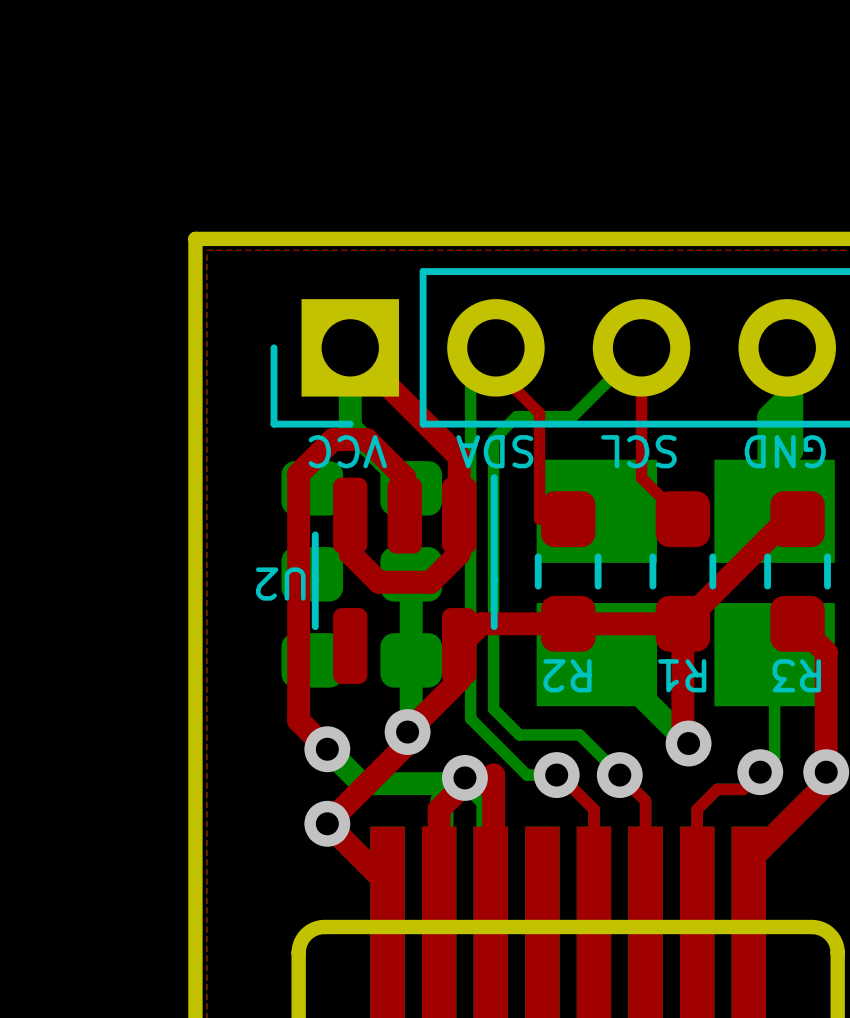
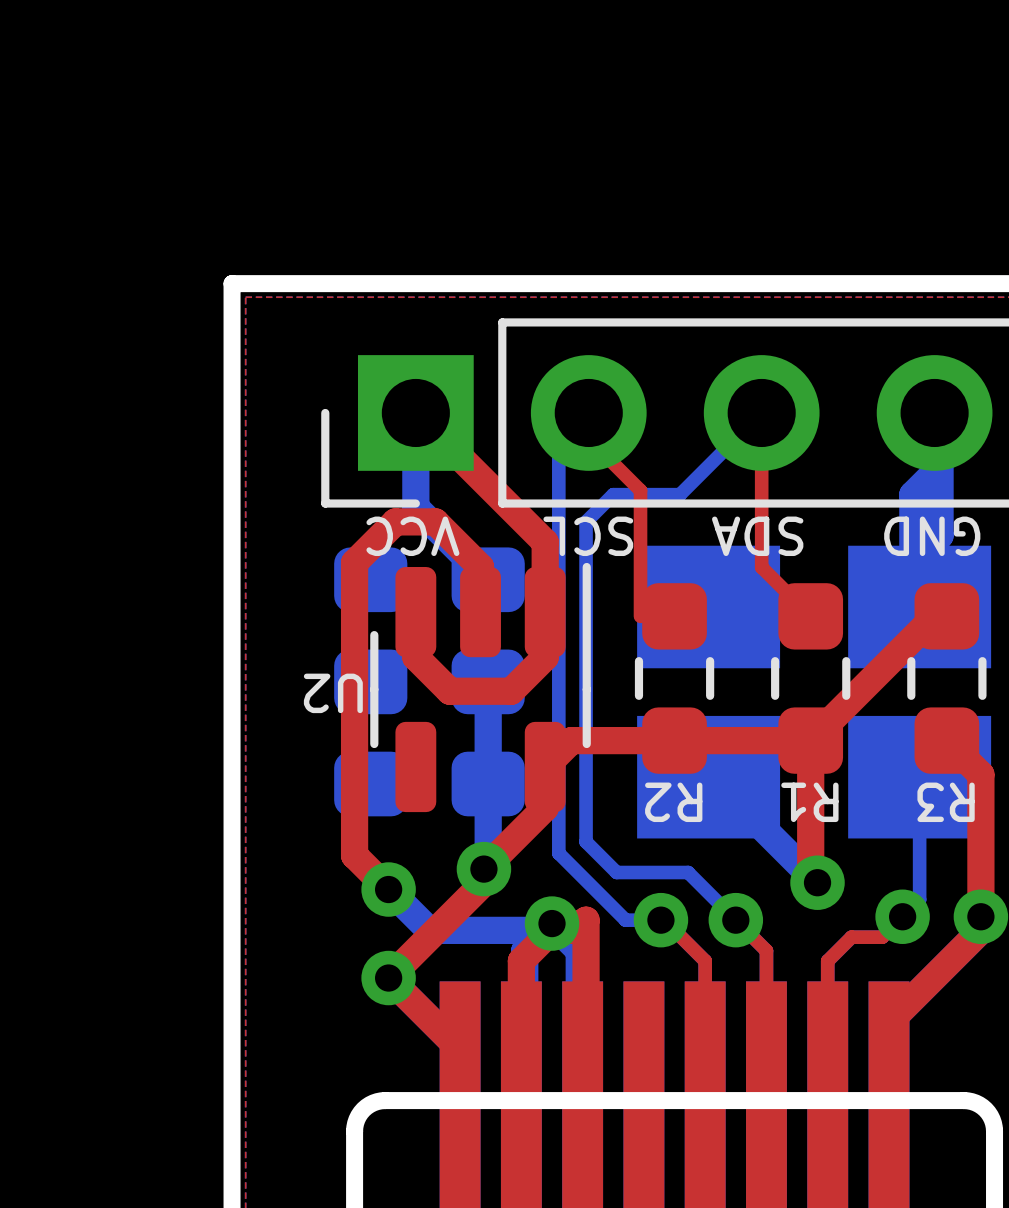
text: SDA (494, 451) -> SCL (588, 536)
text: SCL (638, 451) -> SDA (757, 536)

